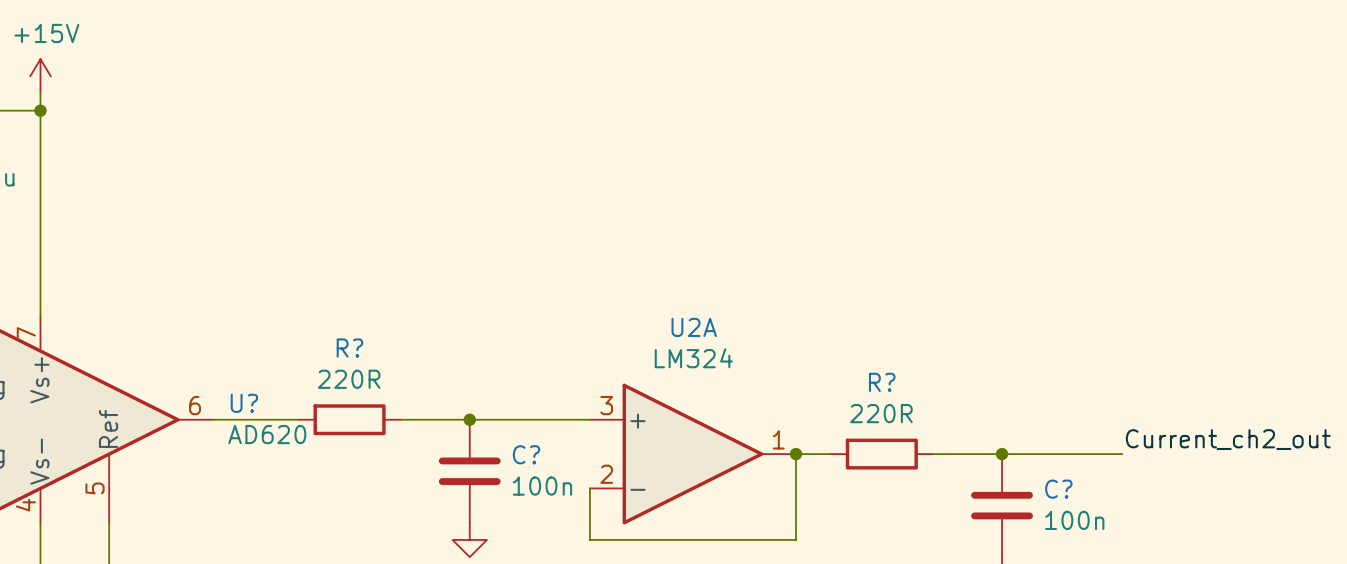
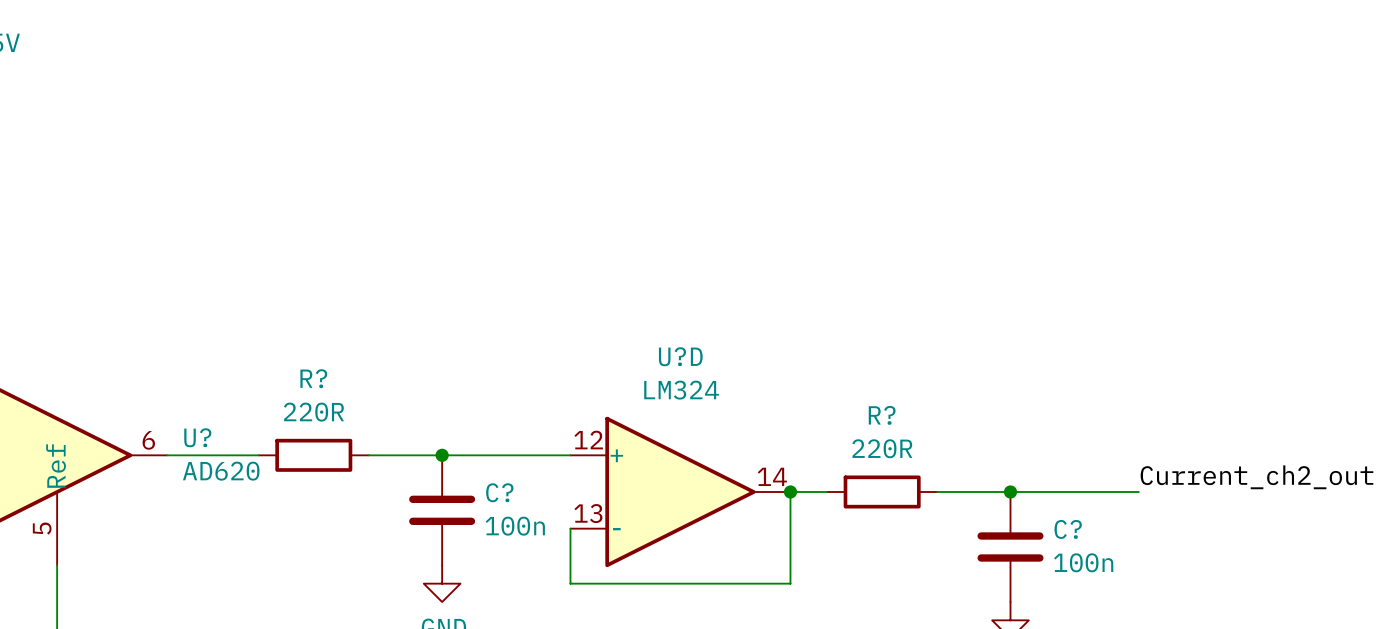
U2A name: U2A (694, 327) -> U?D (680, 356)
U2A pin number: 3 (606, 405) -> 12 (588, 440)
U2A pin number: 1 (778, 439) -> 14 (772, 476)
U2A pin number: 2 (606, 474) -> 13 (588, 513)

